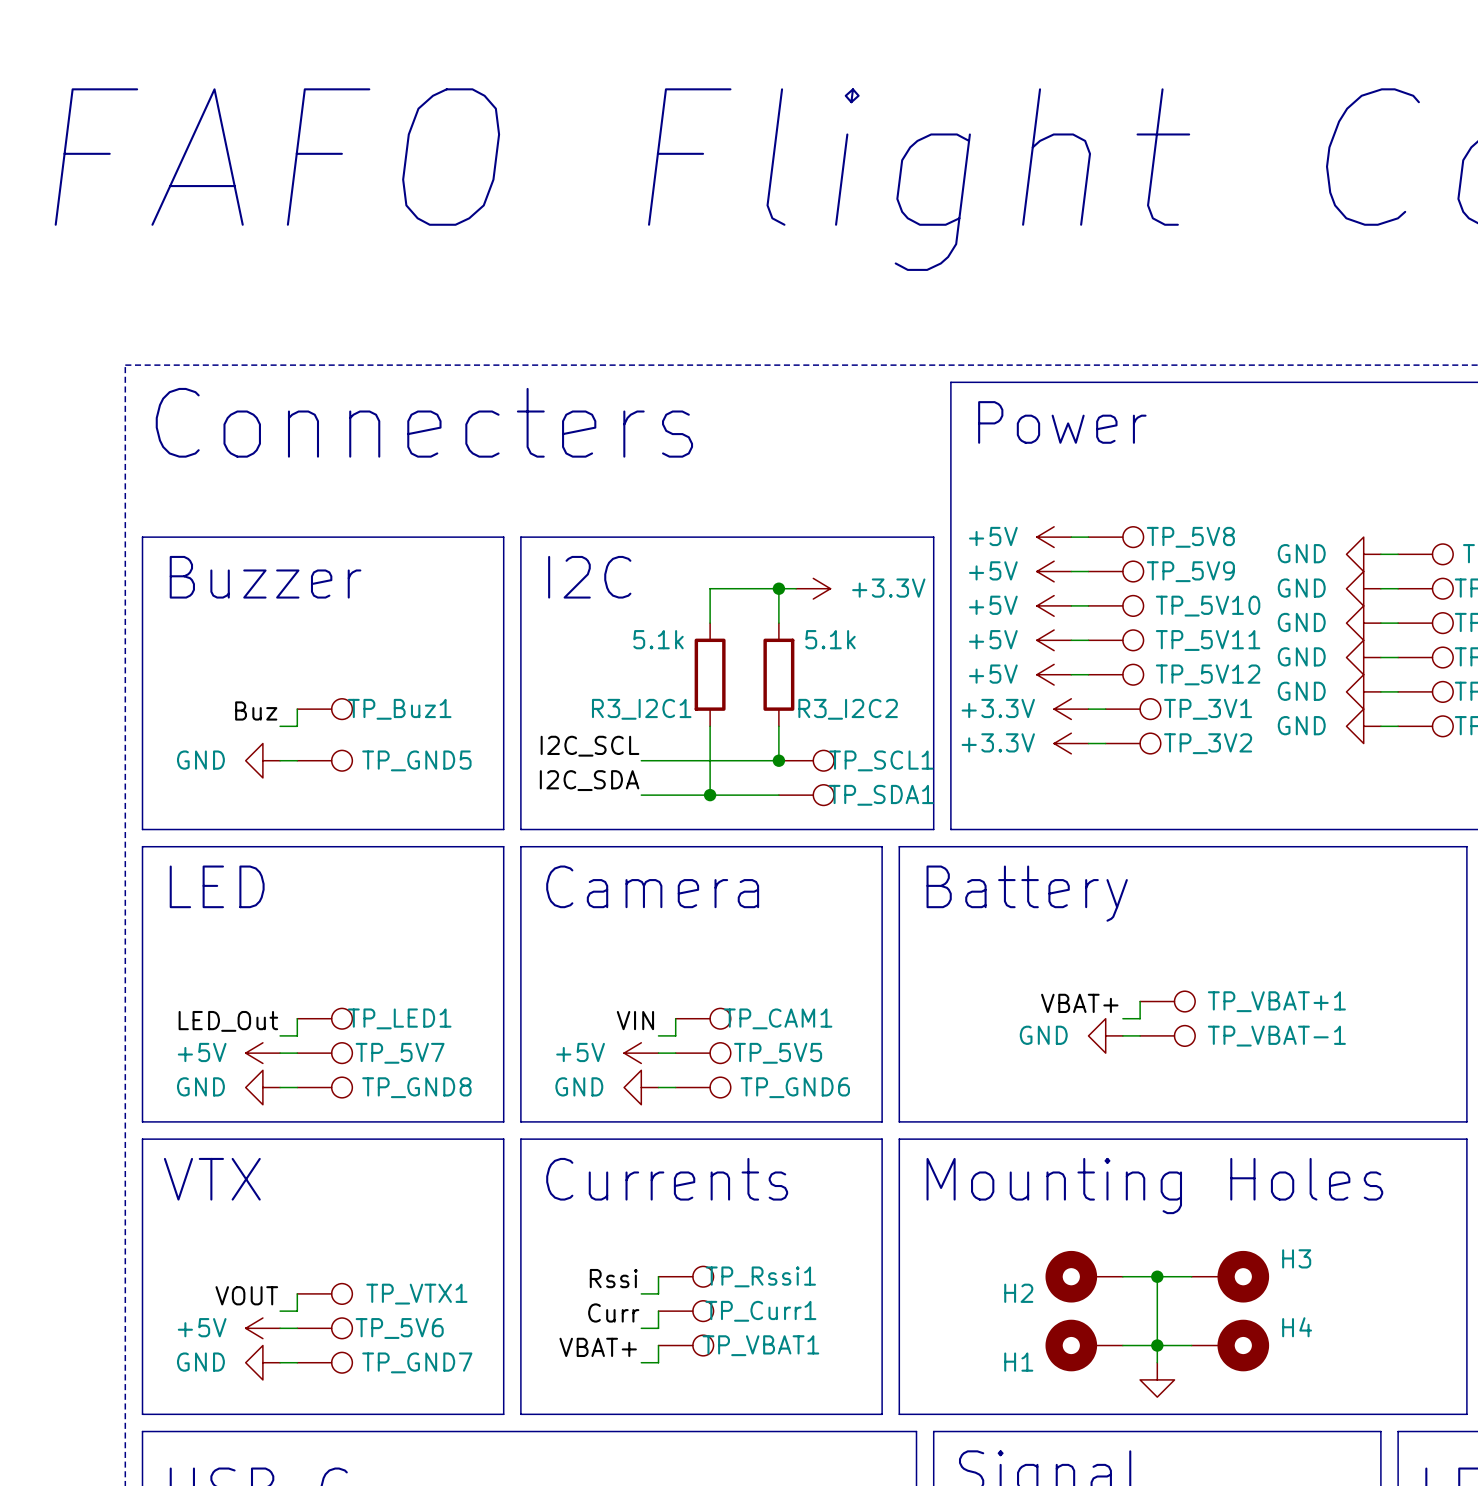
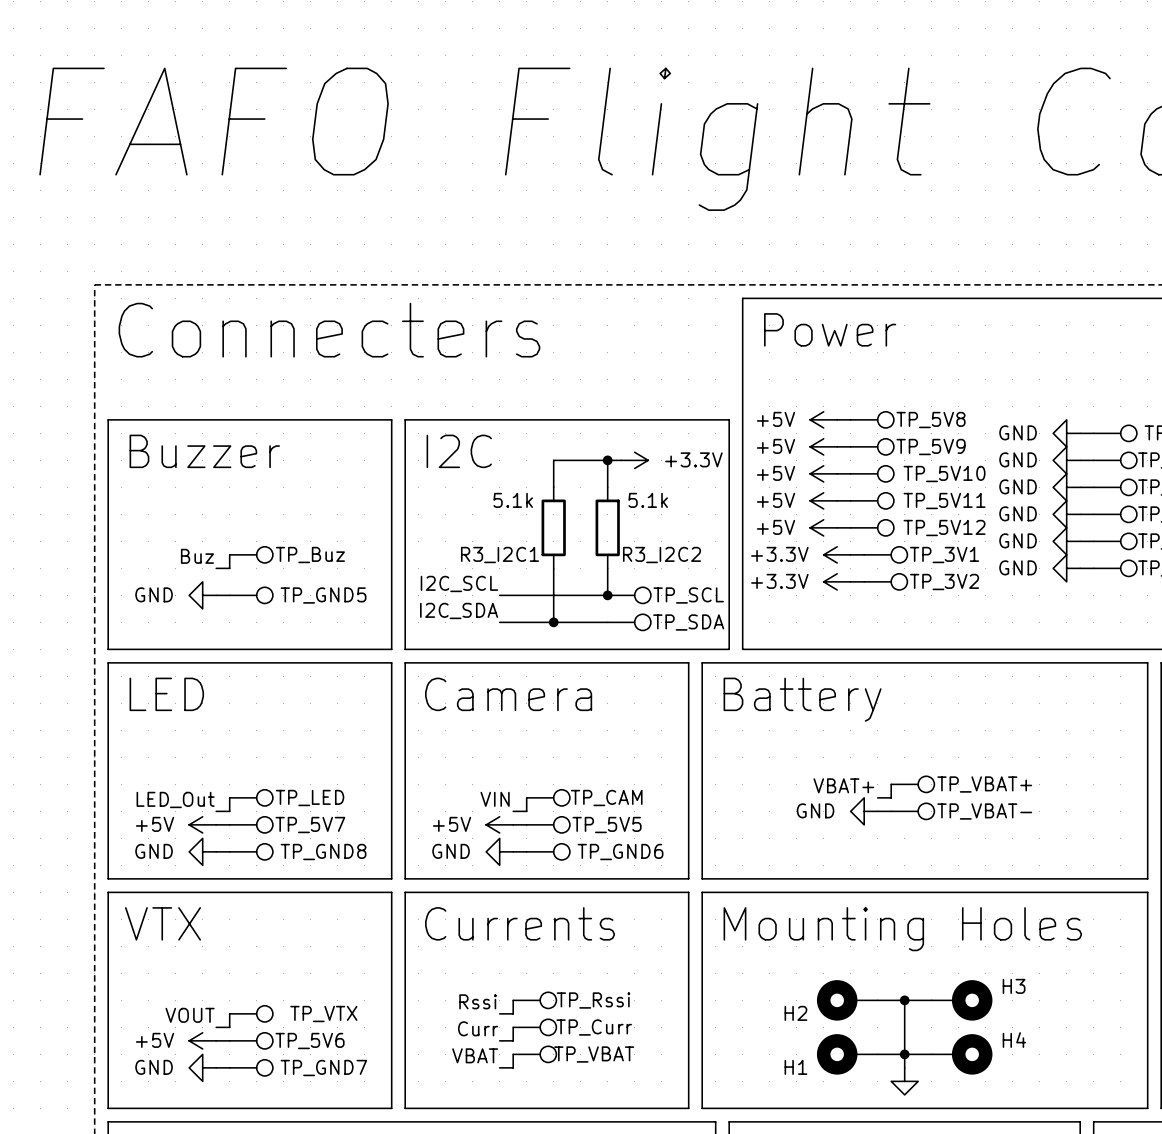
TP_Buz1 name: TP_Buz1 (399, 709) -> TP_Buz (310, 555)
TP_SCL1 name: TP_SCL1 (881, 760) -> TP_SCL (688, 595)
TP_SDA1 name: TP_SDA1 (881, 795) -> TP_SDA (688, 622)
TP_VBAT+1 name: TP_VBAT+1 (1276, 1001) -> TP_VBAT+ (984, 784)
TP_LED1 name: TP_LED1 (399, 1018) -> TP_LED (310, 798)
TP_CAM1 name: TP_CAM1 (778, 1018) -> TP_CAM (606, 798)
TP_VBAT-1 name: TP_VBAT-1 (1276, 1036) -> TP_VBAT- (984, 811)
TP_Rssi1 name: TP_Rssi1 (760, 1276) -> TP_Rssi (593, 1000)
TP_VTX1 name: TP_VTX1 (416, 1294) -> TP_VTX (323, 1014)
TP_Curr1 name: TP_Curr1 (760, 1311) -> TP_Curr (594, 1027)
TP_VBAT1 name: TP_VBAT1 (760, 1345) -> TP_VBAT (594, 1054)
label: VBAT+ (598, 1347) -> VBAT (475, 1055)

